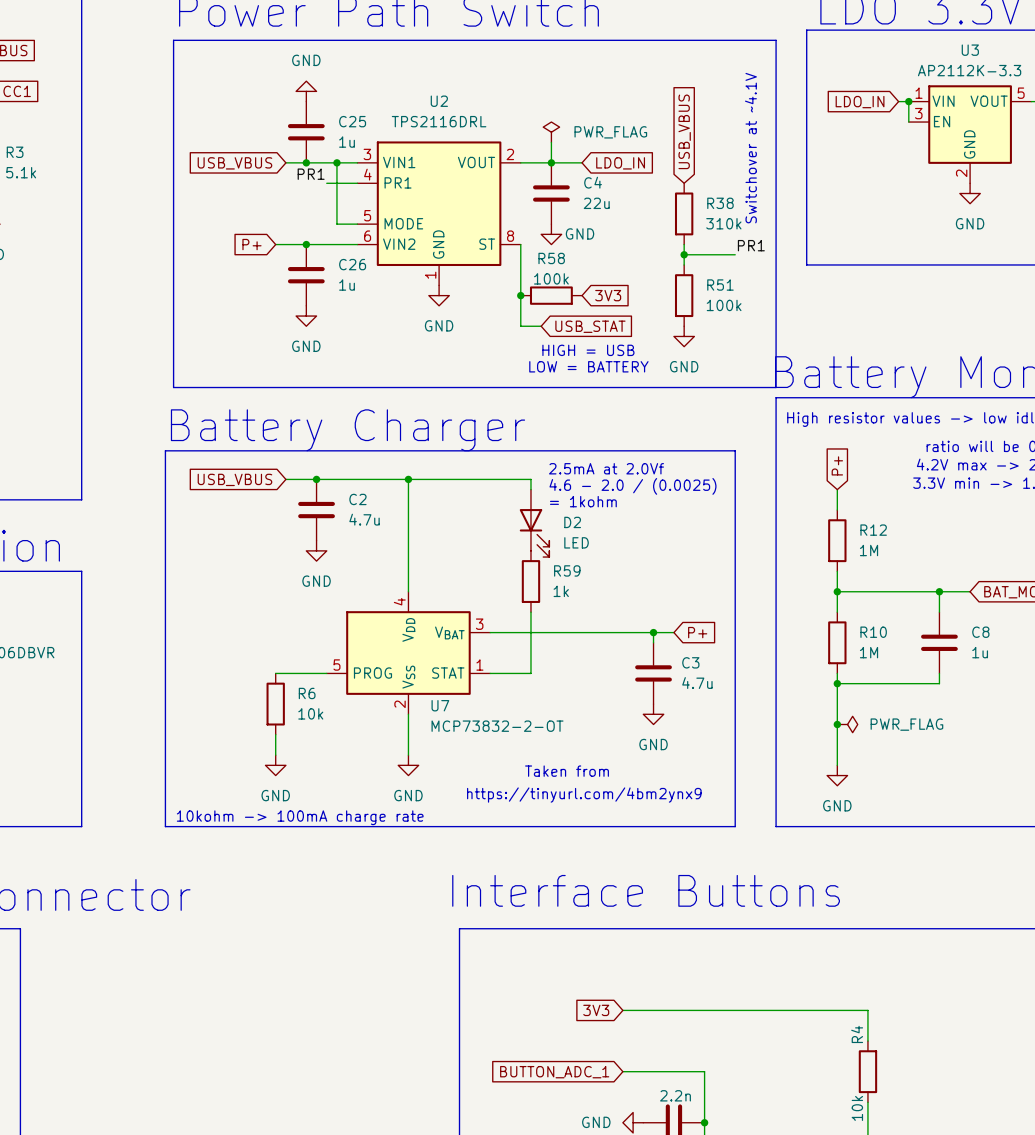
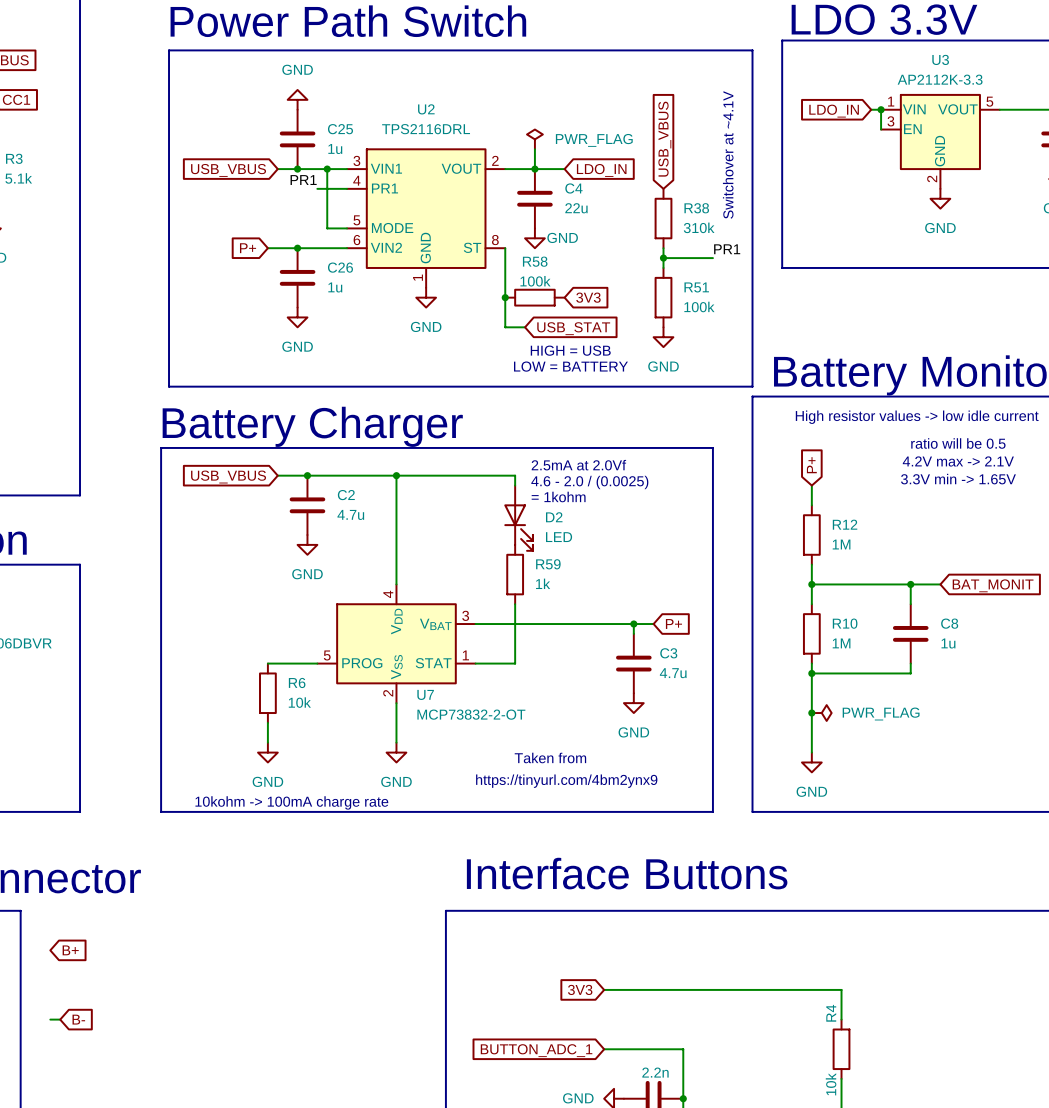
global label: none -> B+ (70, 950)
wire: none -> (50, 1019) (60, 1019)
global label: none -> B- (78, 1019)

